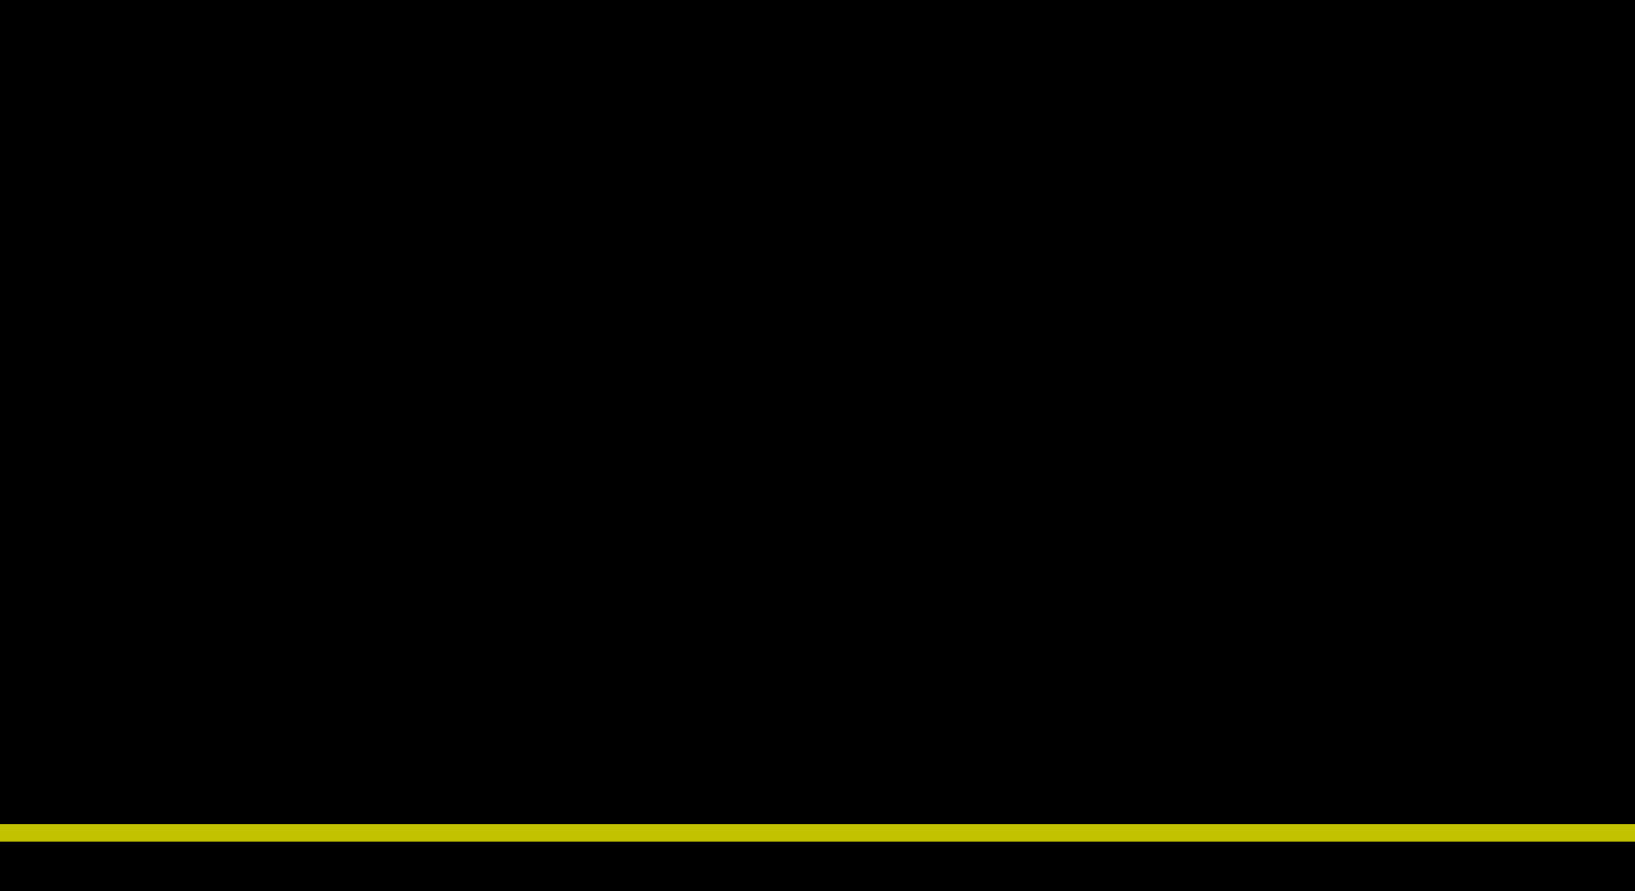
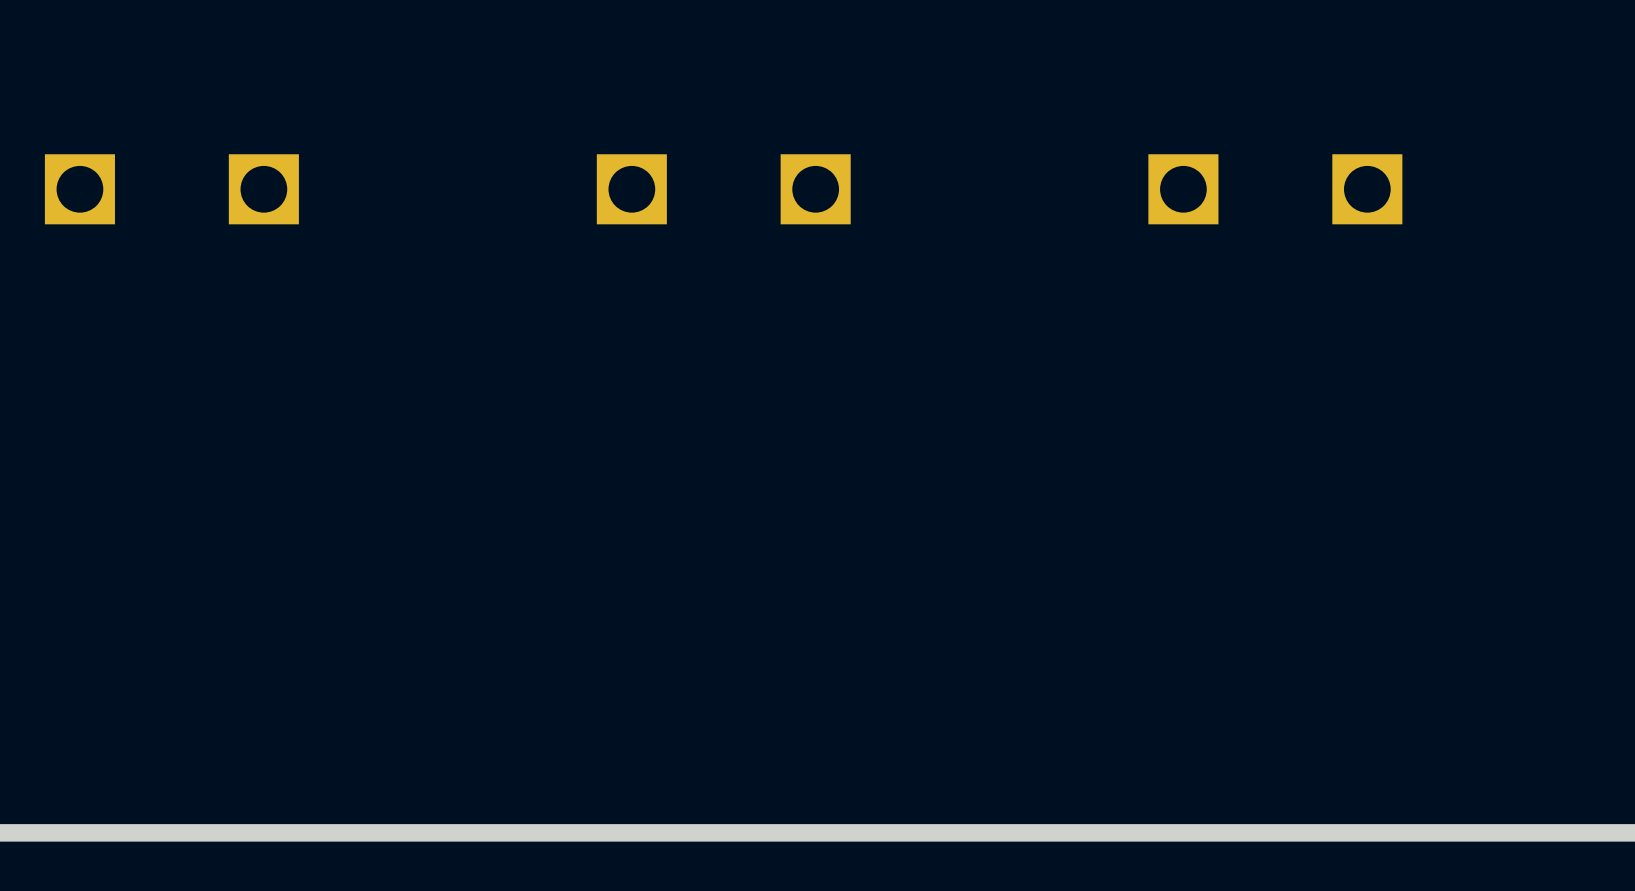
part: none -> (79, 189)
part: none -> (263, 189)
part: none -> (631, 189)
part: none -> (815, 189)
part: none -> (1183, 189)
part: none -> (1367, 189)

